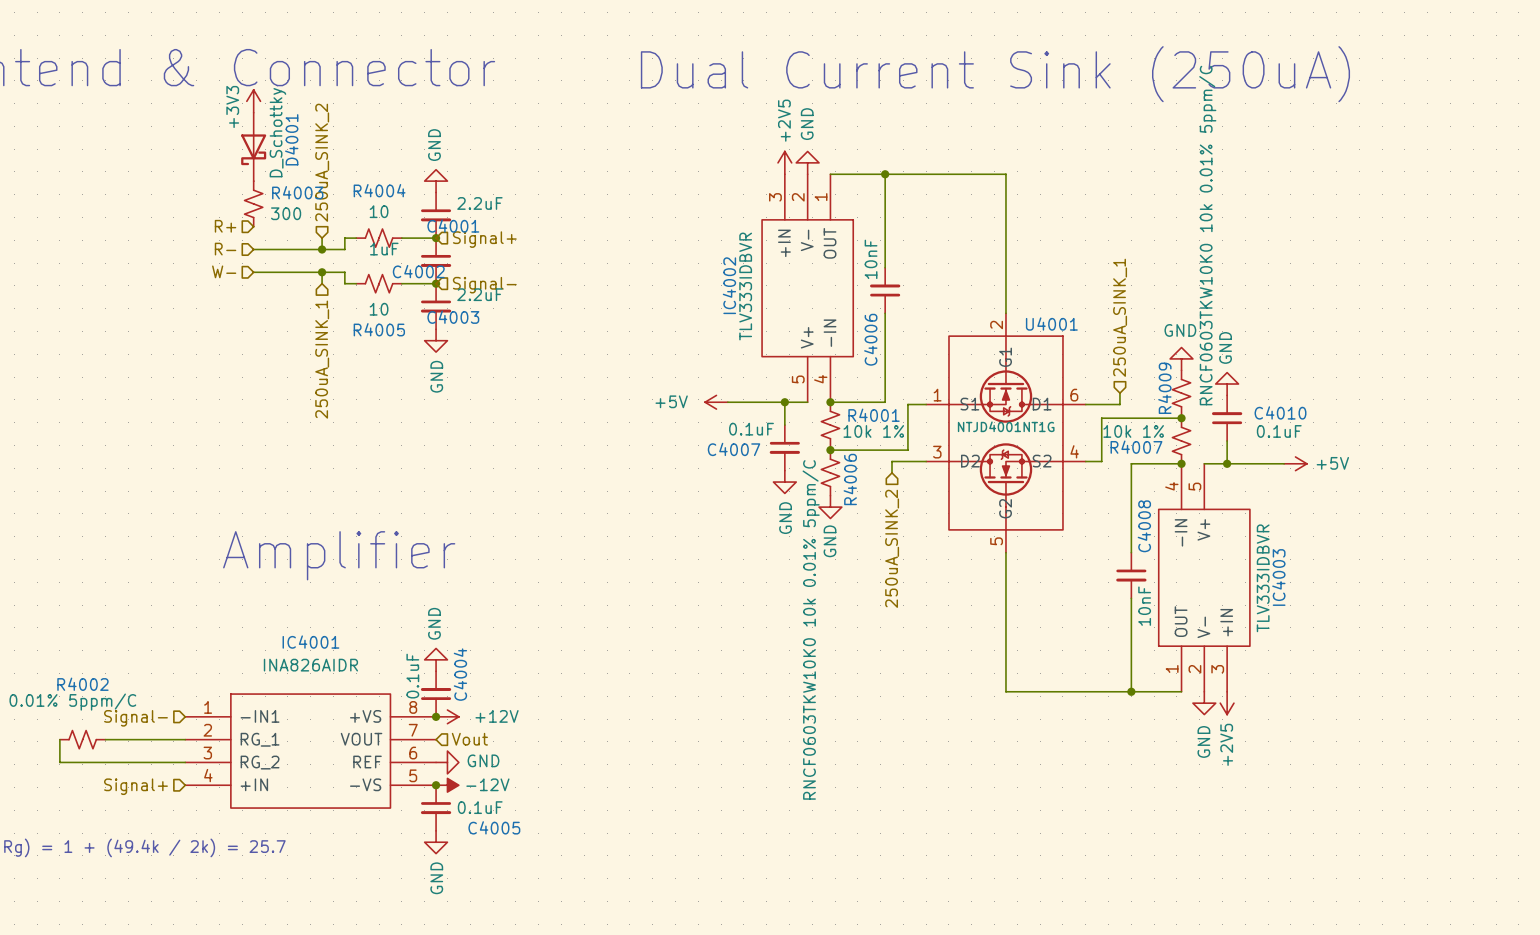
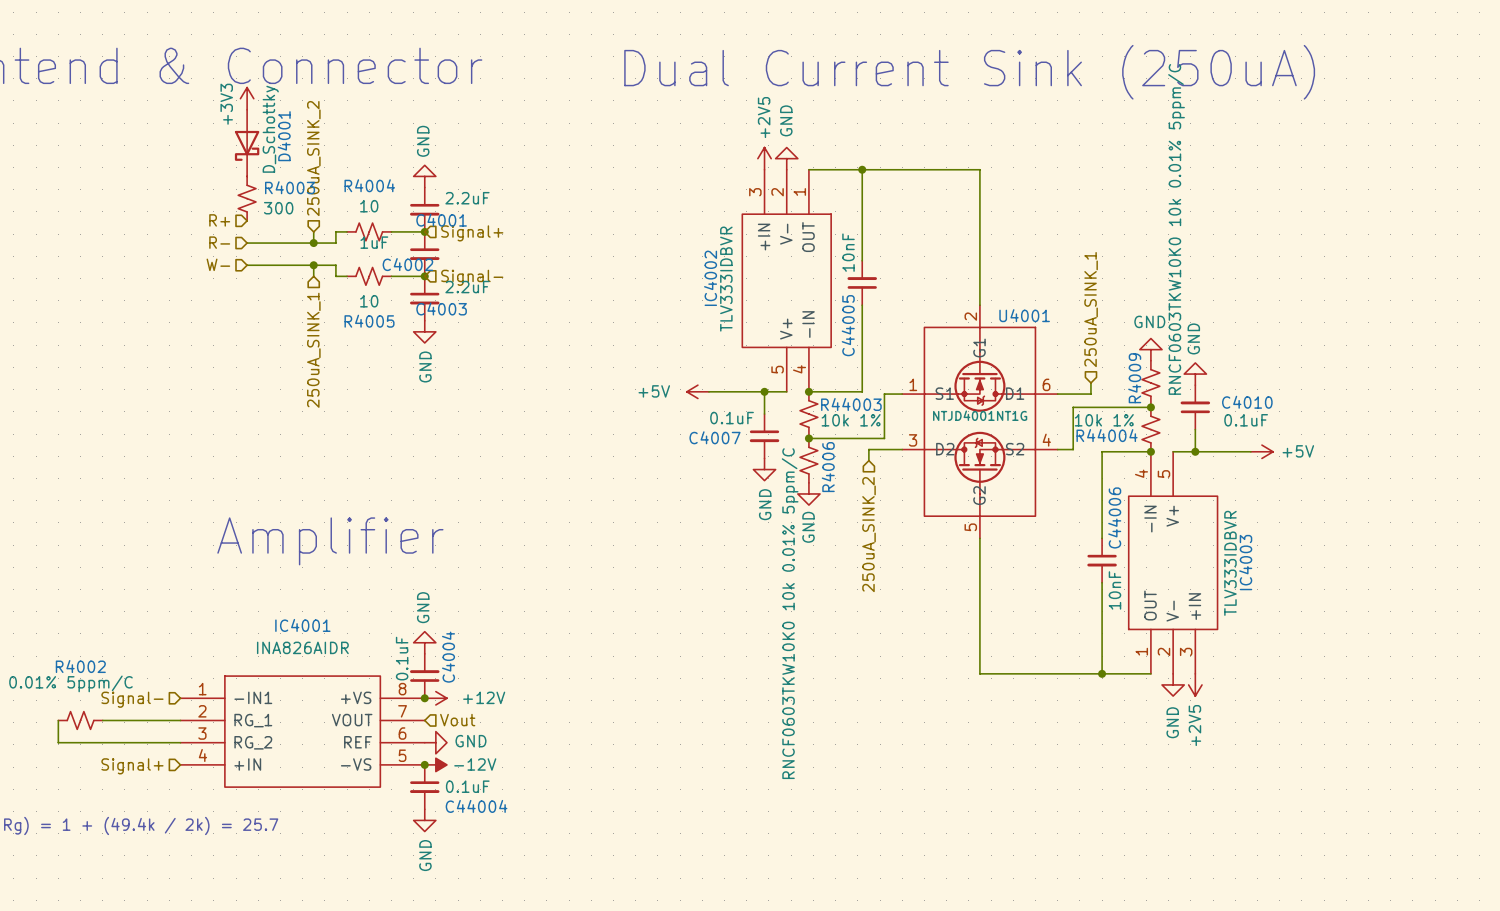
C4006 name: C4006 (870, 339) -> C44005 (848, 325)
R4001 name: R4001 (874, 415) -> R44003 (851, 404)
R4007 name: R4007 (1136, 447) -> R44004 (1107, 435)
C4008 name: C4008 (1144, 526) -> C44006 (1114, 517)
C4005 name: C4005 (494, 827) -> C44004 (476, 806)

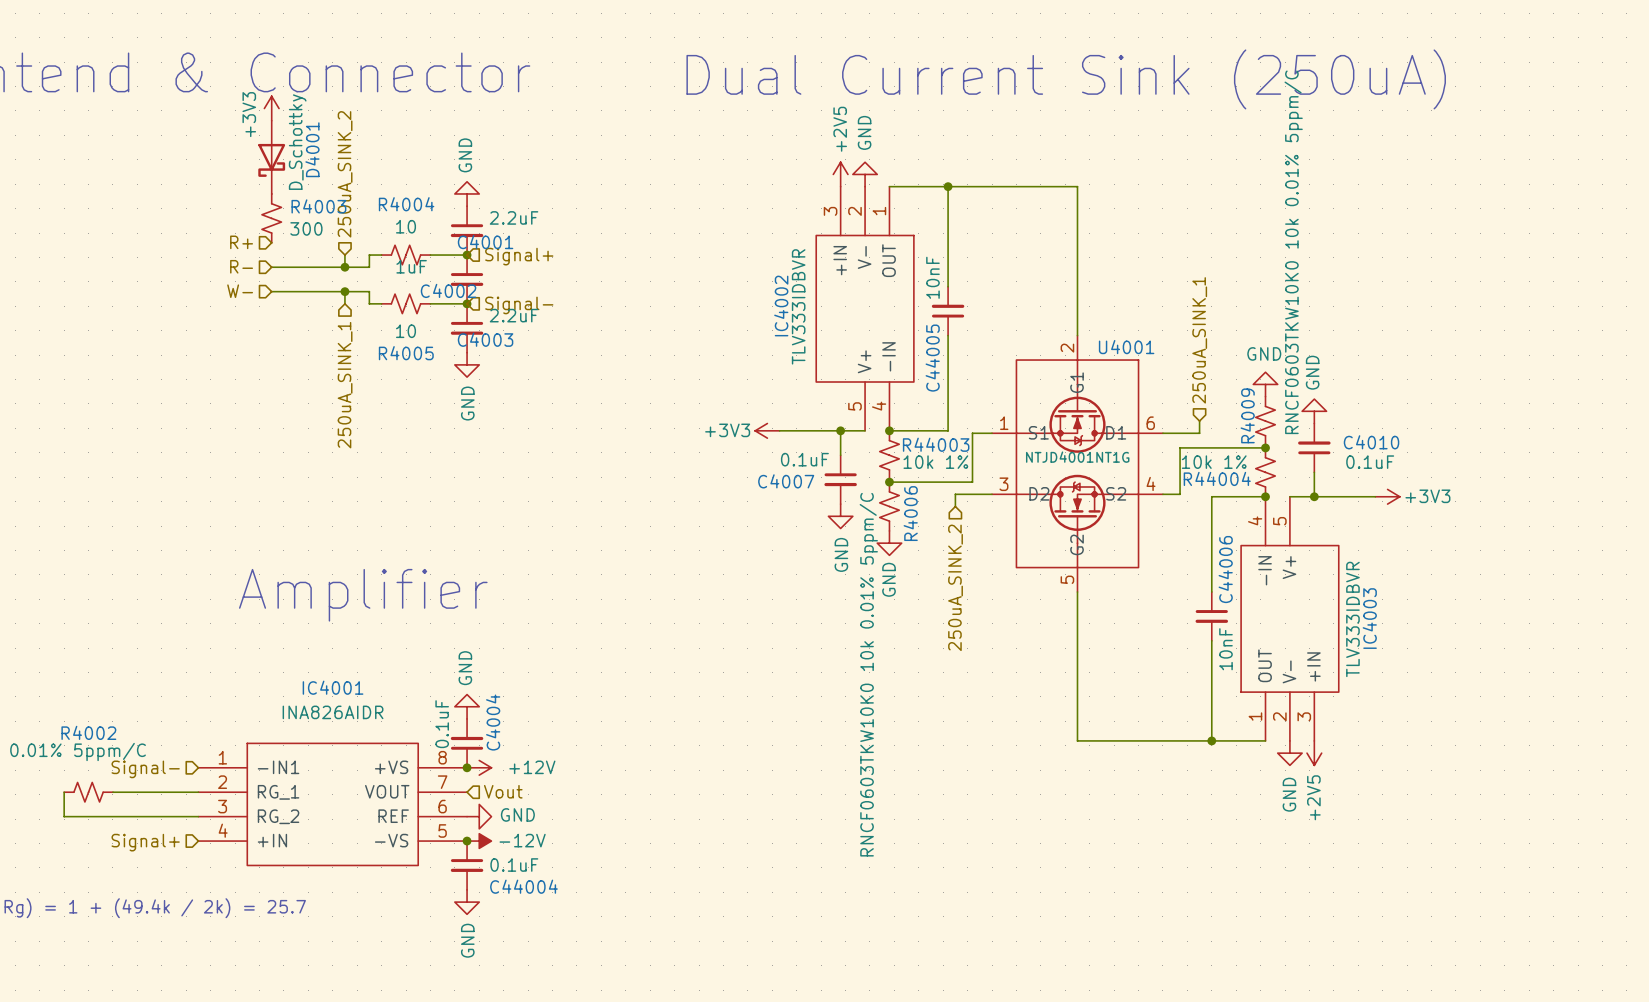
power symbol: +5V (697, 391) -> +3V3 (767, 430)
power symbol: +5V (1261, 451) -> +3V3 (1387, 496)

